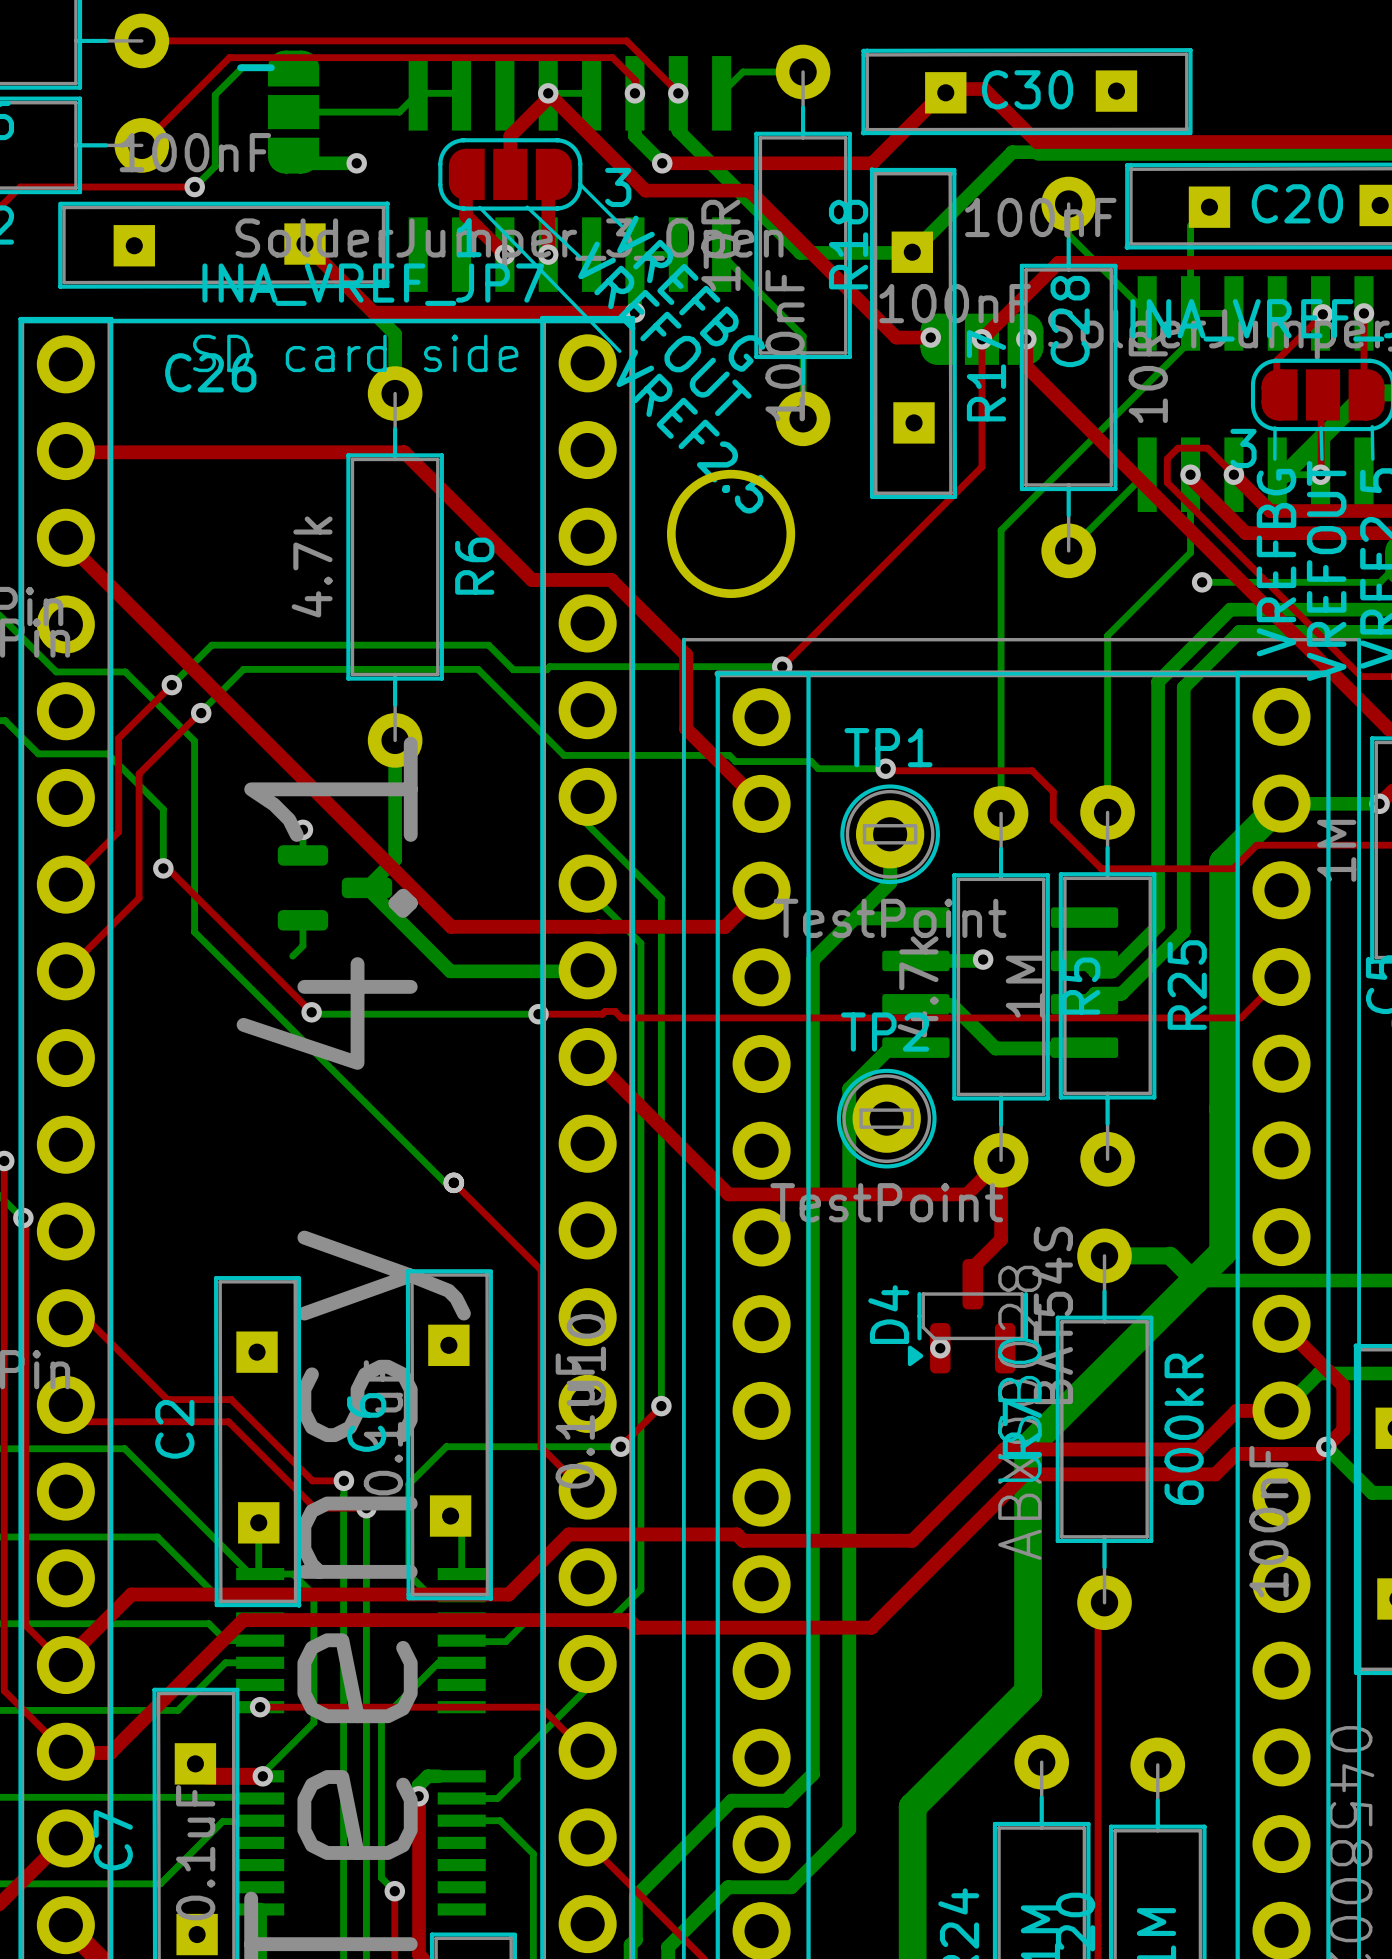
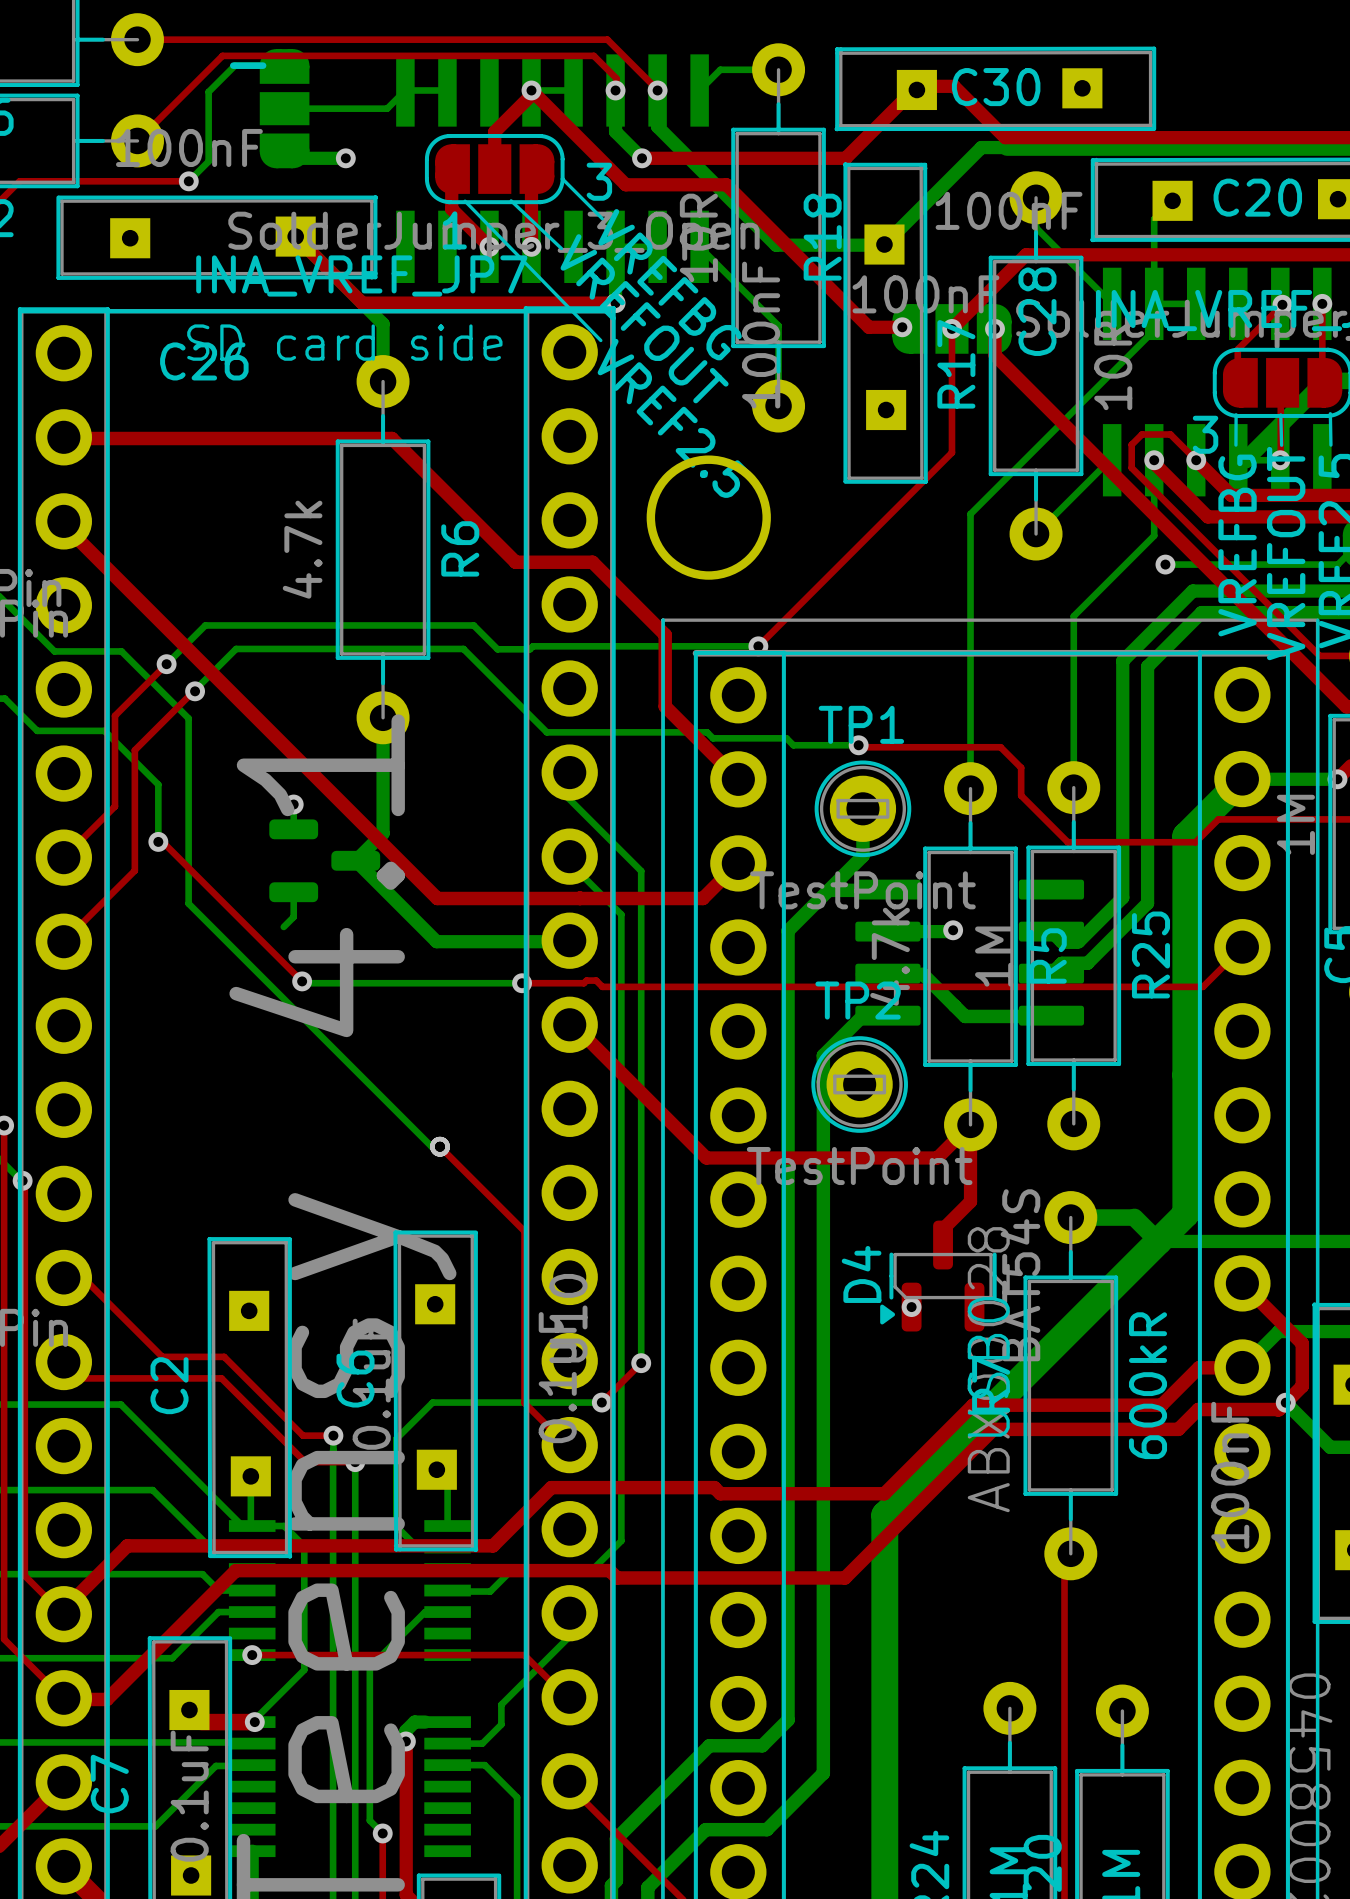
bottom track: (1028, 1447) (1028, 1690) -> (996, 1403) (884, 1515) (884, 1751)
bottom track: (1028, 1691) (912, 1806) -> none

